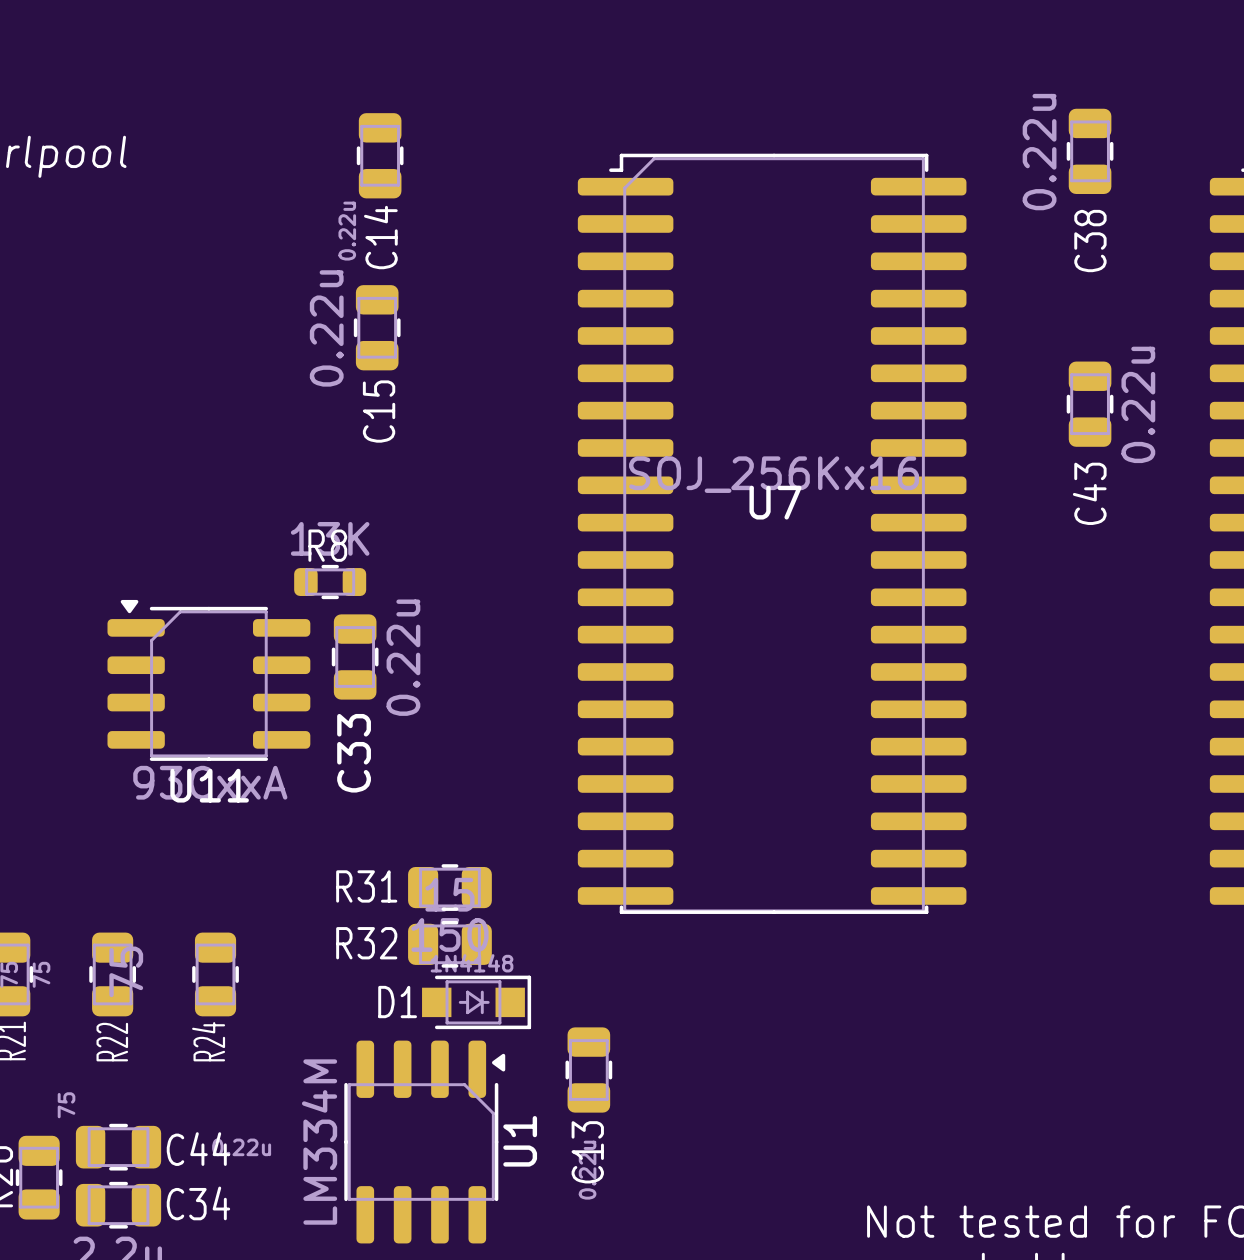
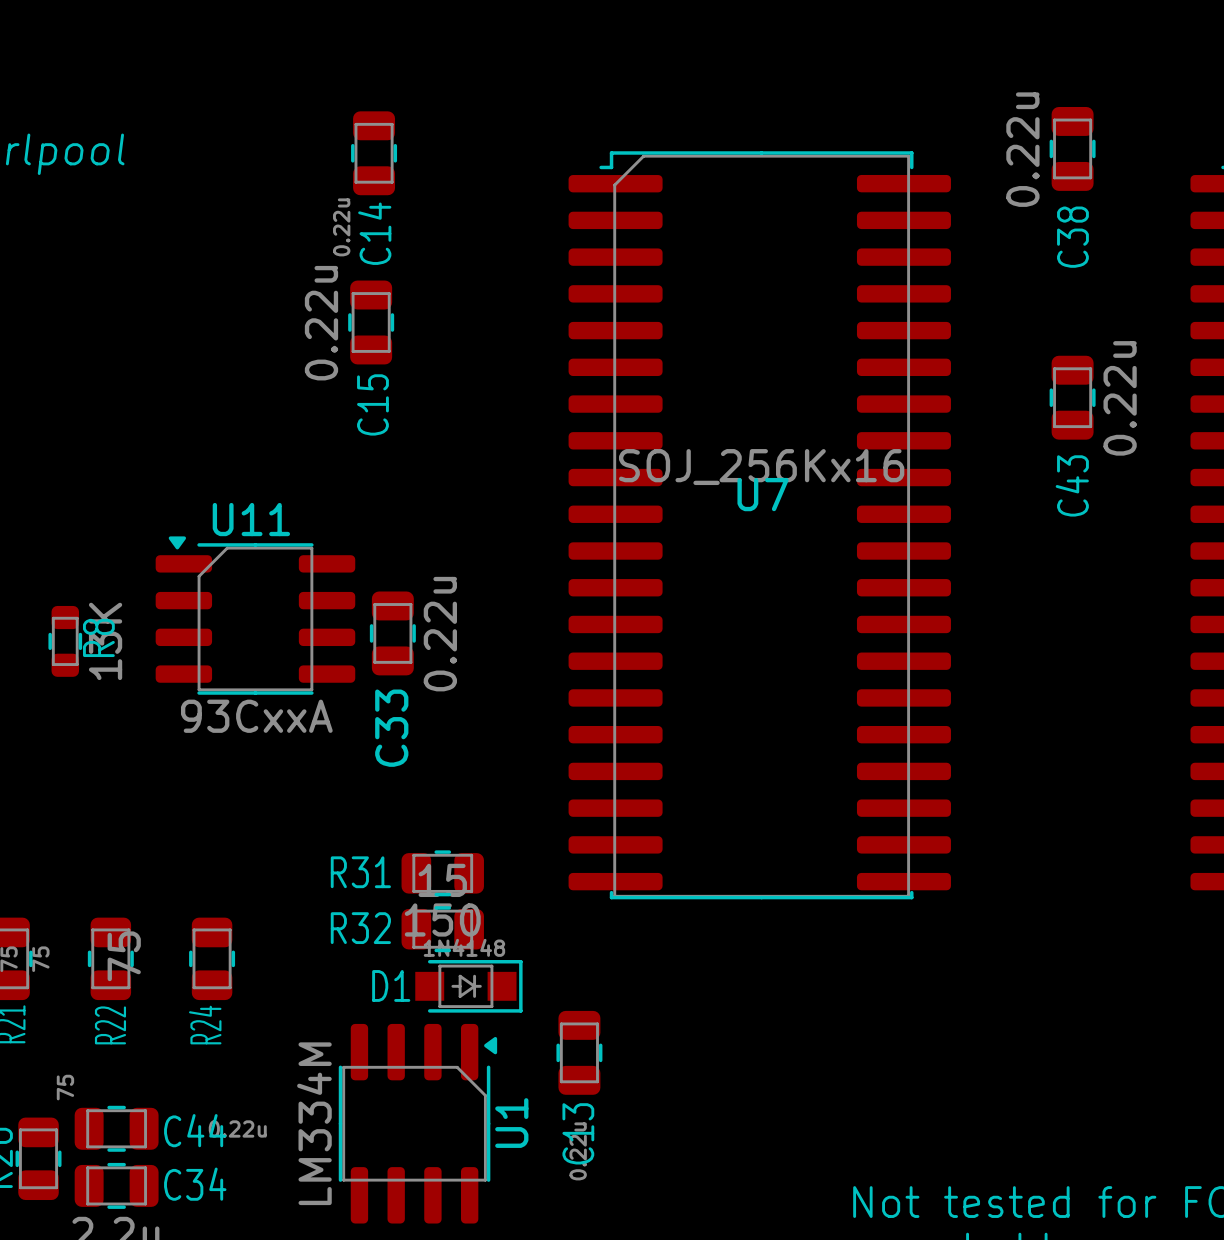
R8 rotation: 0° (330, 582) -> 90° clockwise (65, 641)
R8 position: (330, 582) -> (65, 641)
C33 position: (355, 656) -> (392, 633)
U11 position: (208, 680) -> (255, 615)
U11 name position: U11 (209, 785) -> U11 (251, 519)

